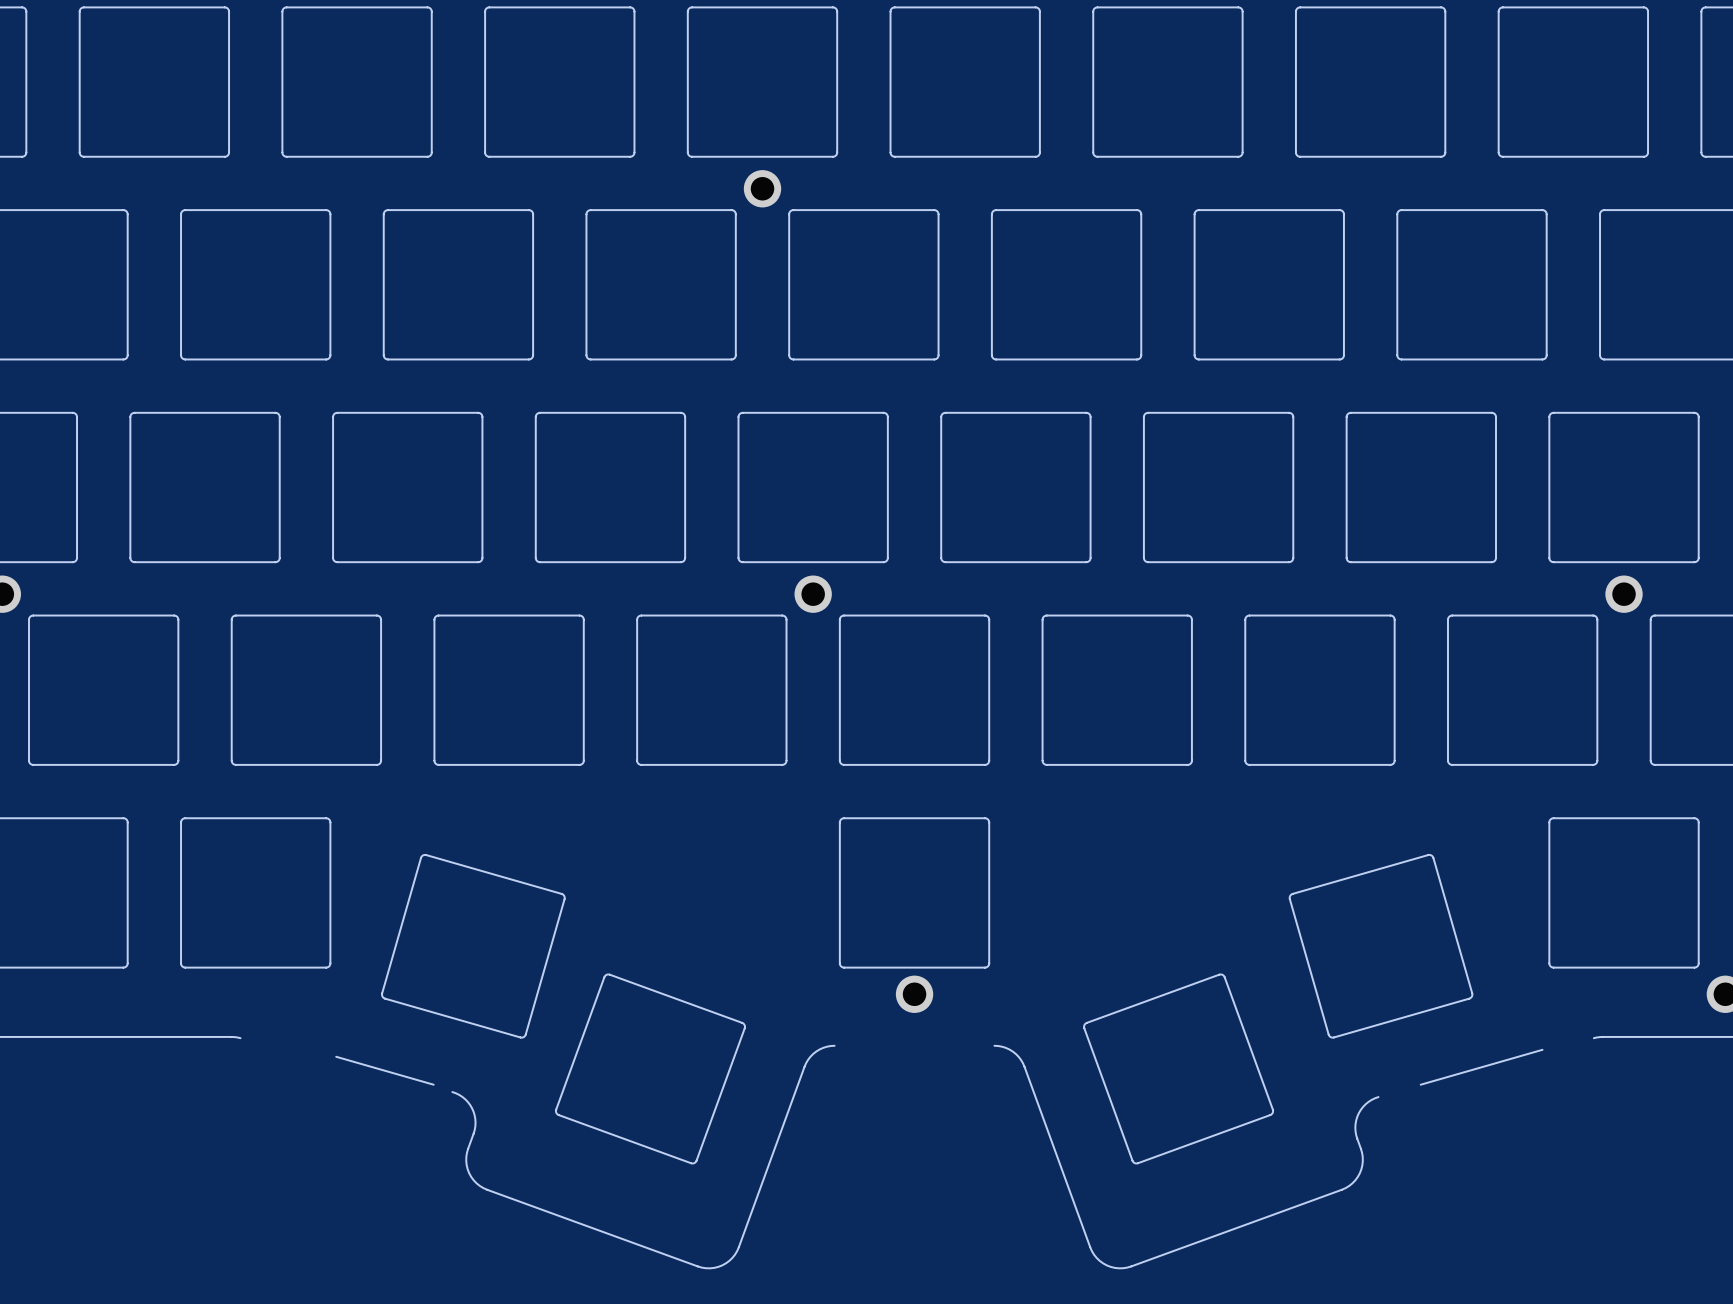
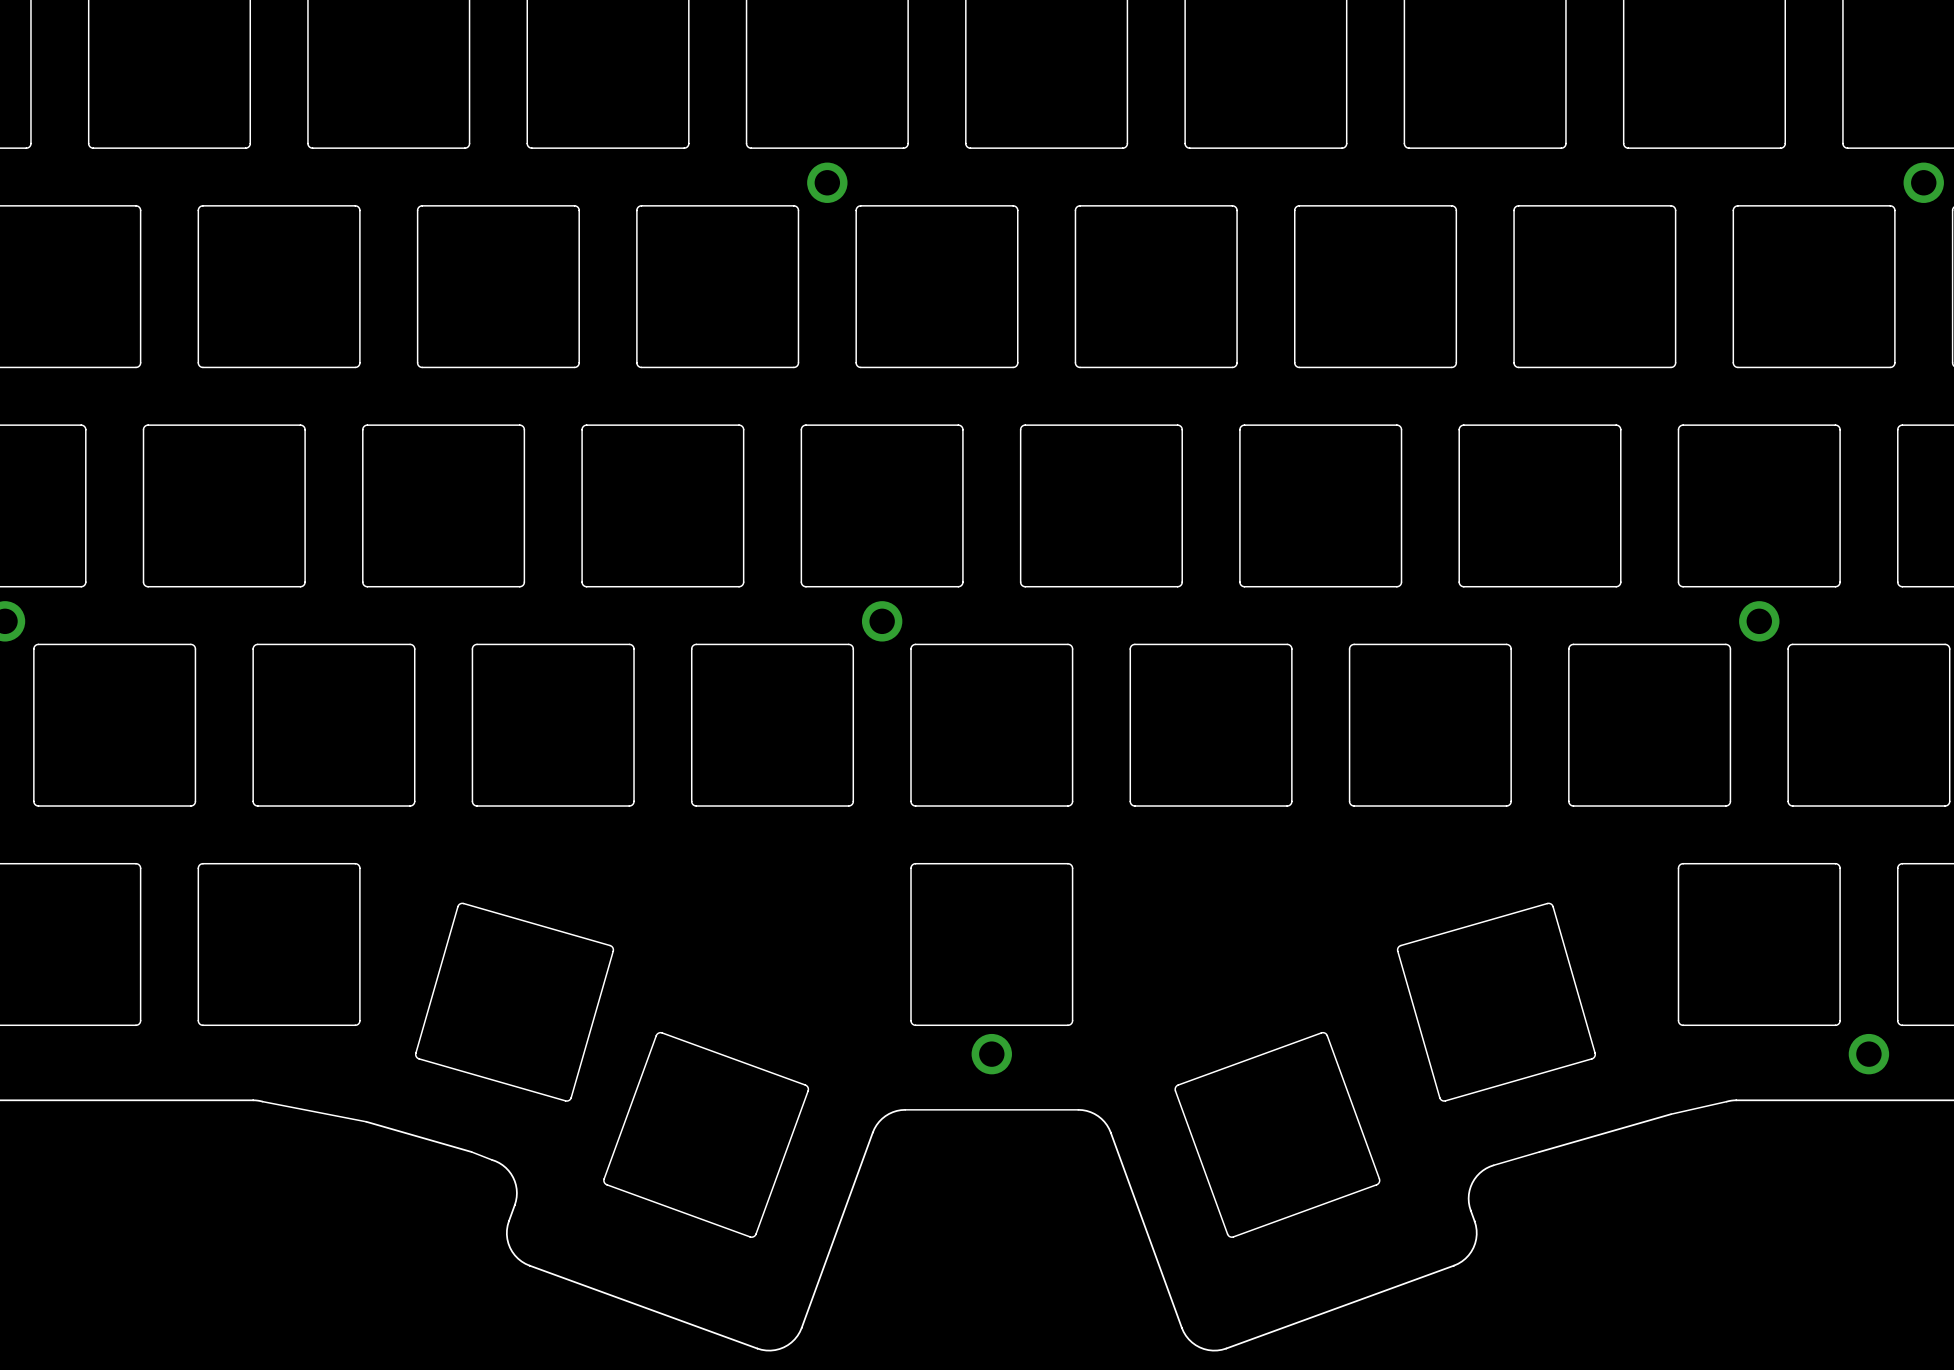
board edge: none -> (262, 1101) (366, 1121)
board edge: none -> (1726, 1101) (1671, 1114)
board edge: none -> (1078, 1109) (905, 1109)
board edge: none -> (471, 1151) (491, 1159)
board edge: none -> (1539, 1151) (1493, 1165)

